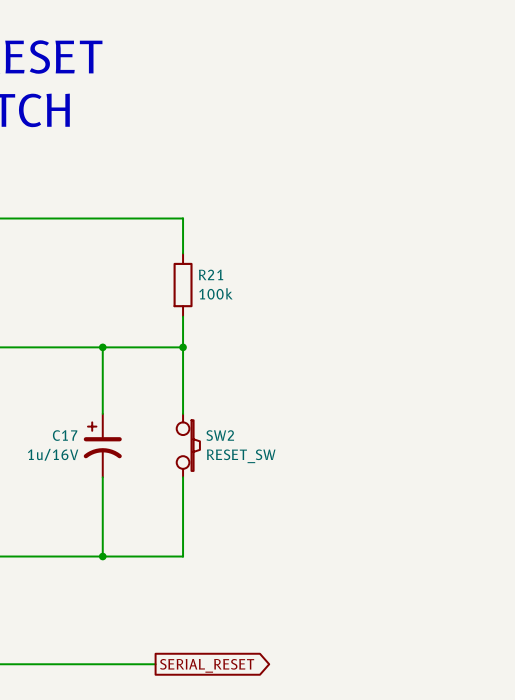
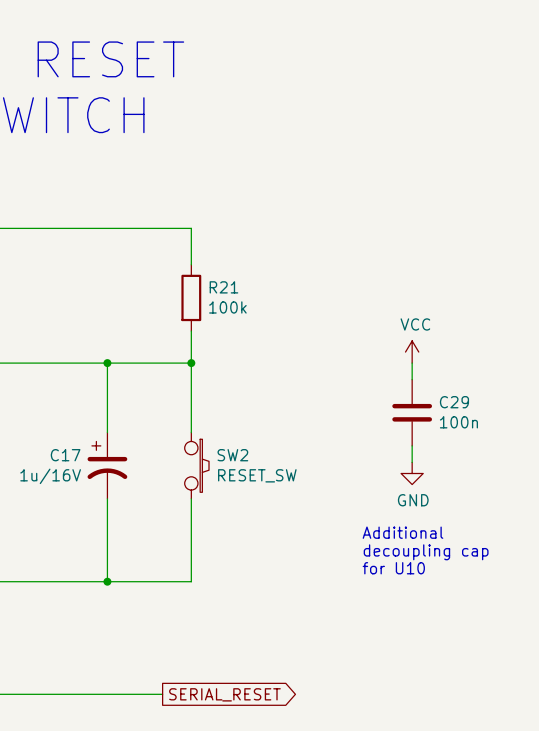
power symbol: none -> VCC (412, 352)
wire: none -> (412, 363) (412, 379)
C29: none -> 100n (412, 412)
wire: none -> (412, 445) (412, 462)
power symbol: none -> GND (412, 473)
text: none -> Additional (402, 532)
text: none -> decoupling cap (426, 552)
text: none -> for U10 (393, 568)

